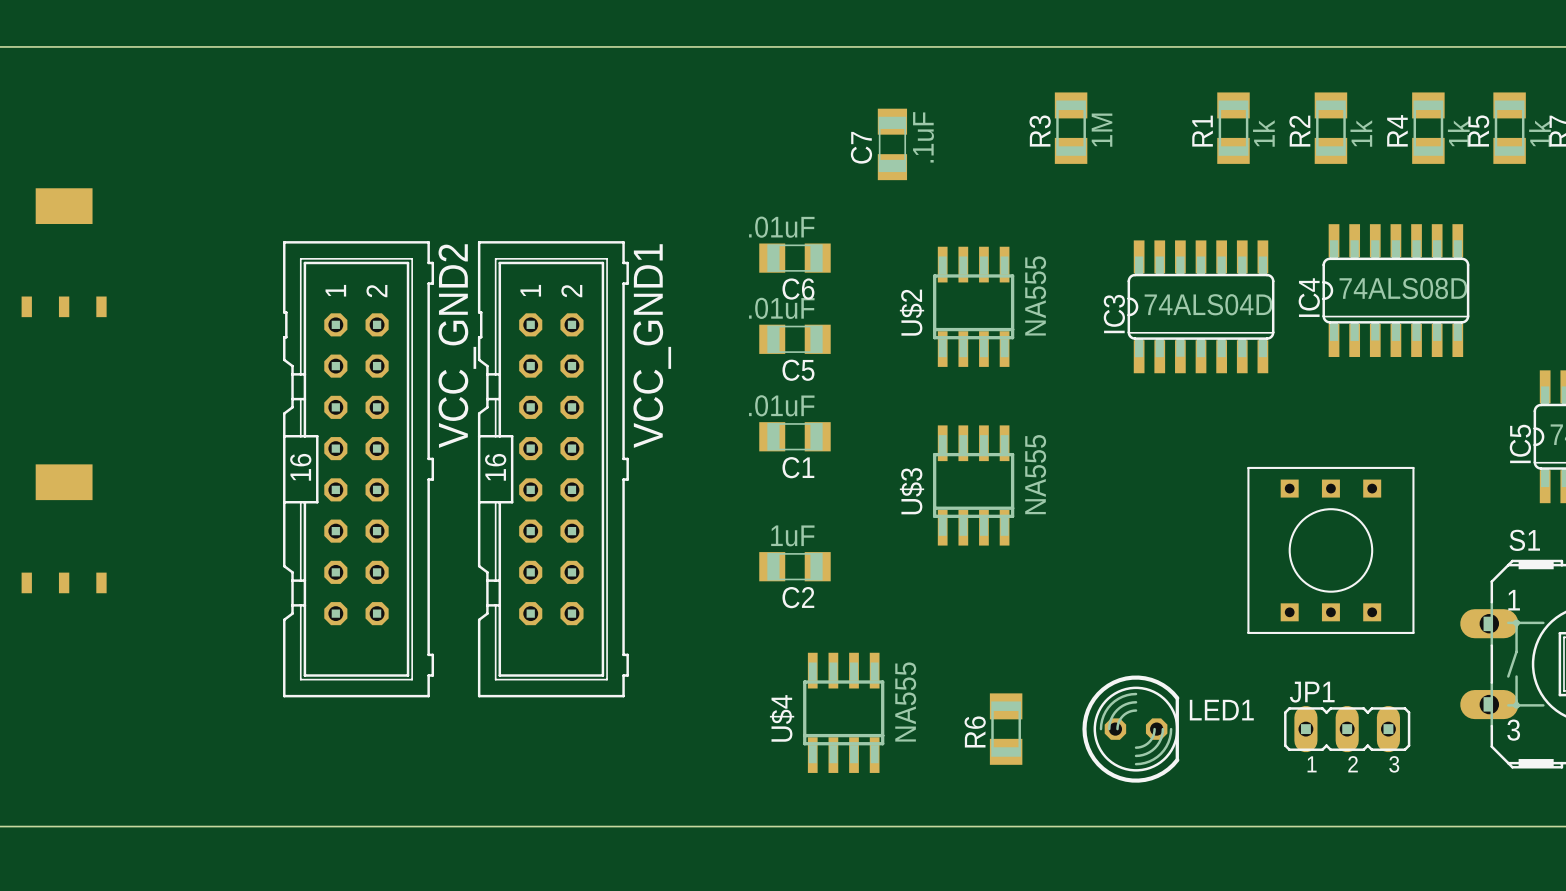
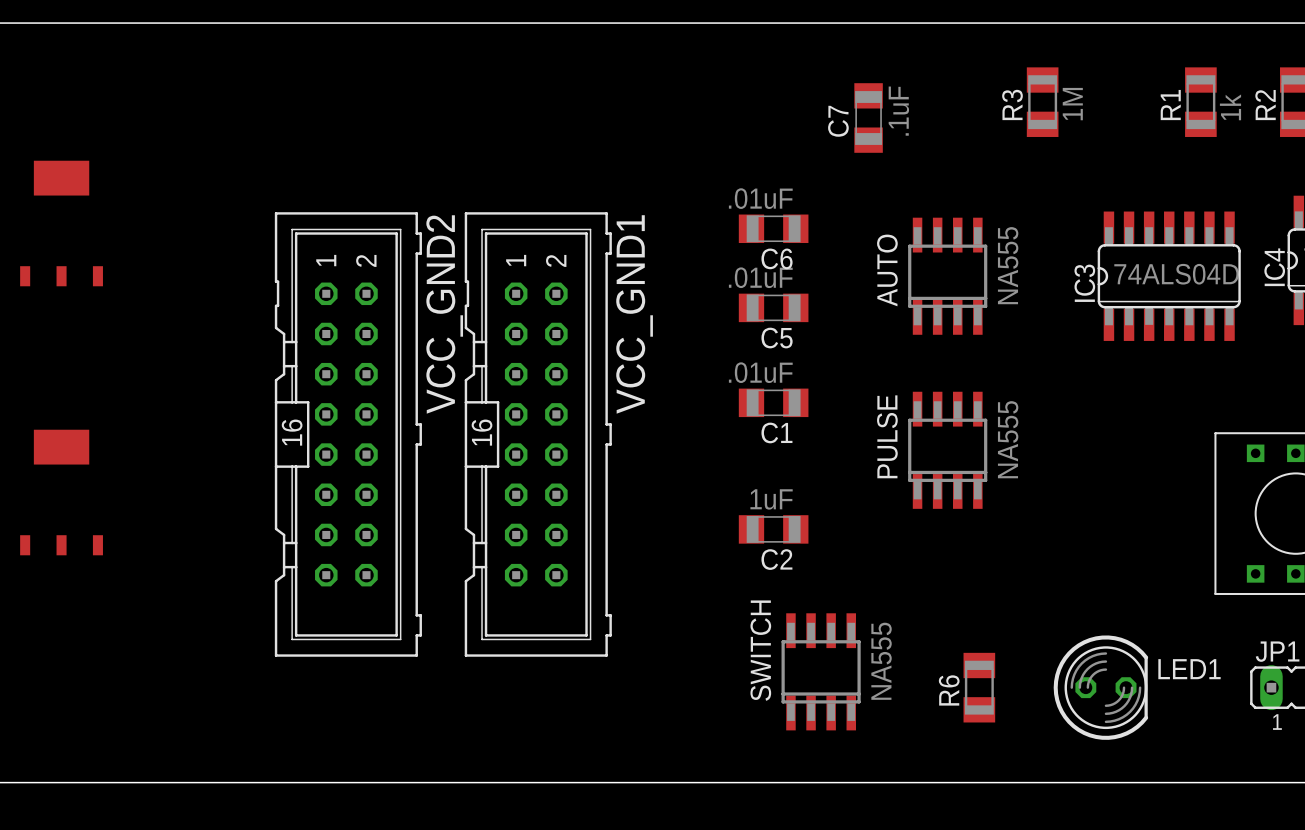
U$2 name: U$2 (912, 312) -> AUTO (887, 270)
U$3 name: U$3 (912, 491) -> PULSE (887, 436)
U$4 name: U$4 (782, 718) -> SWITCH (760, 650)

